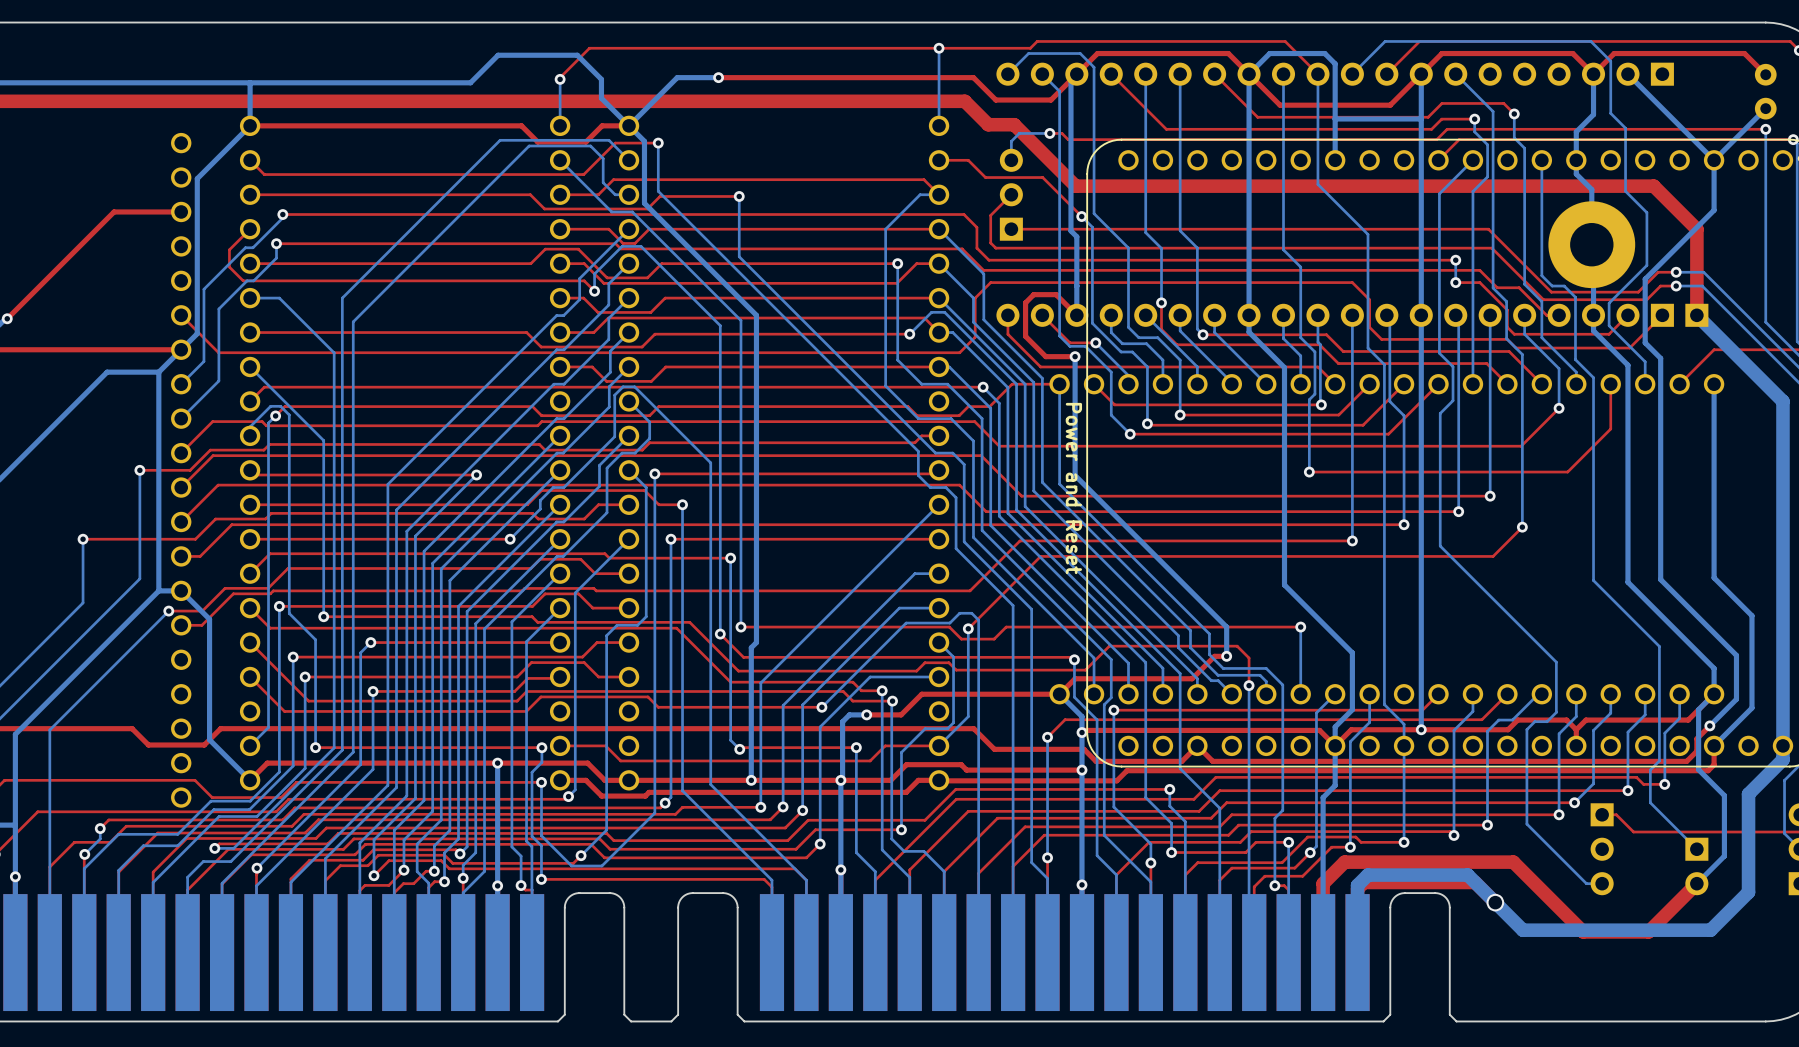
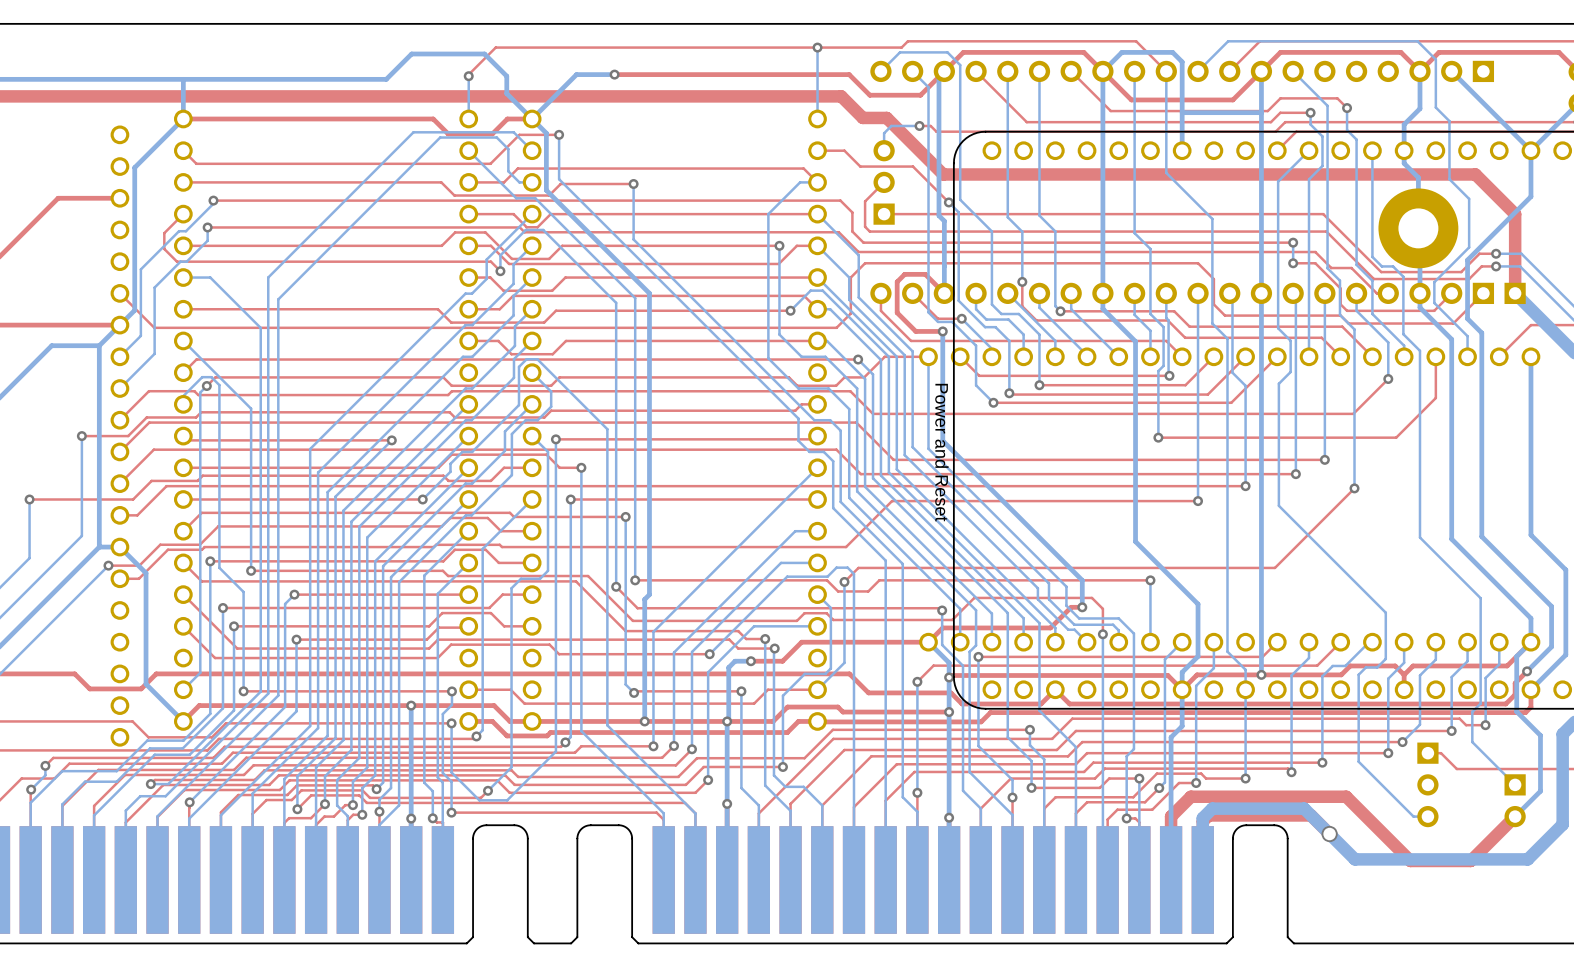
top track: (1493, 556) (1040, 556) (983, 613) -> (1327, 515) (1274, 567) (858, 567)

